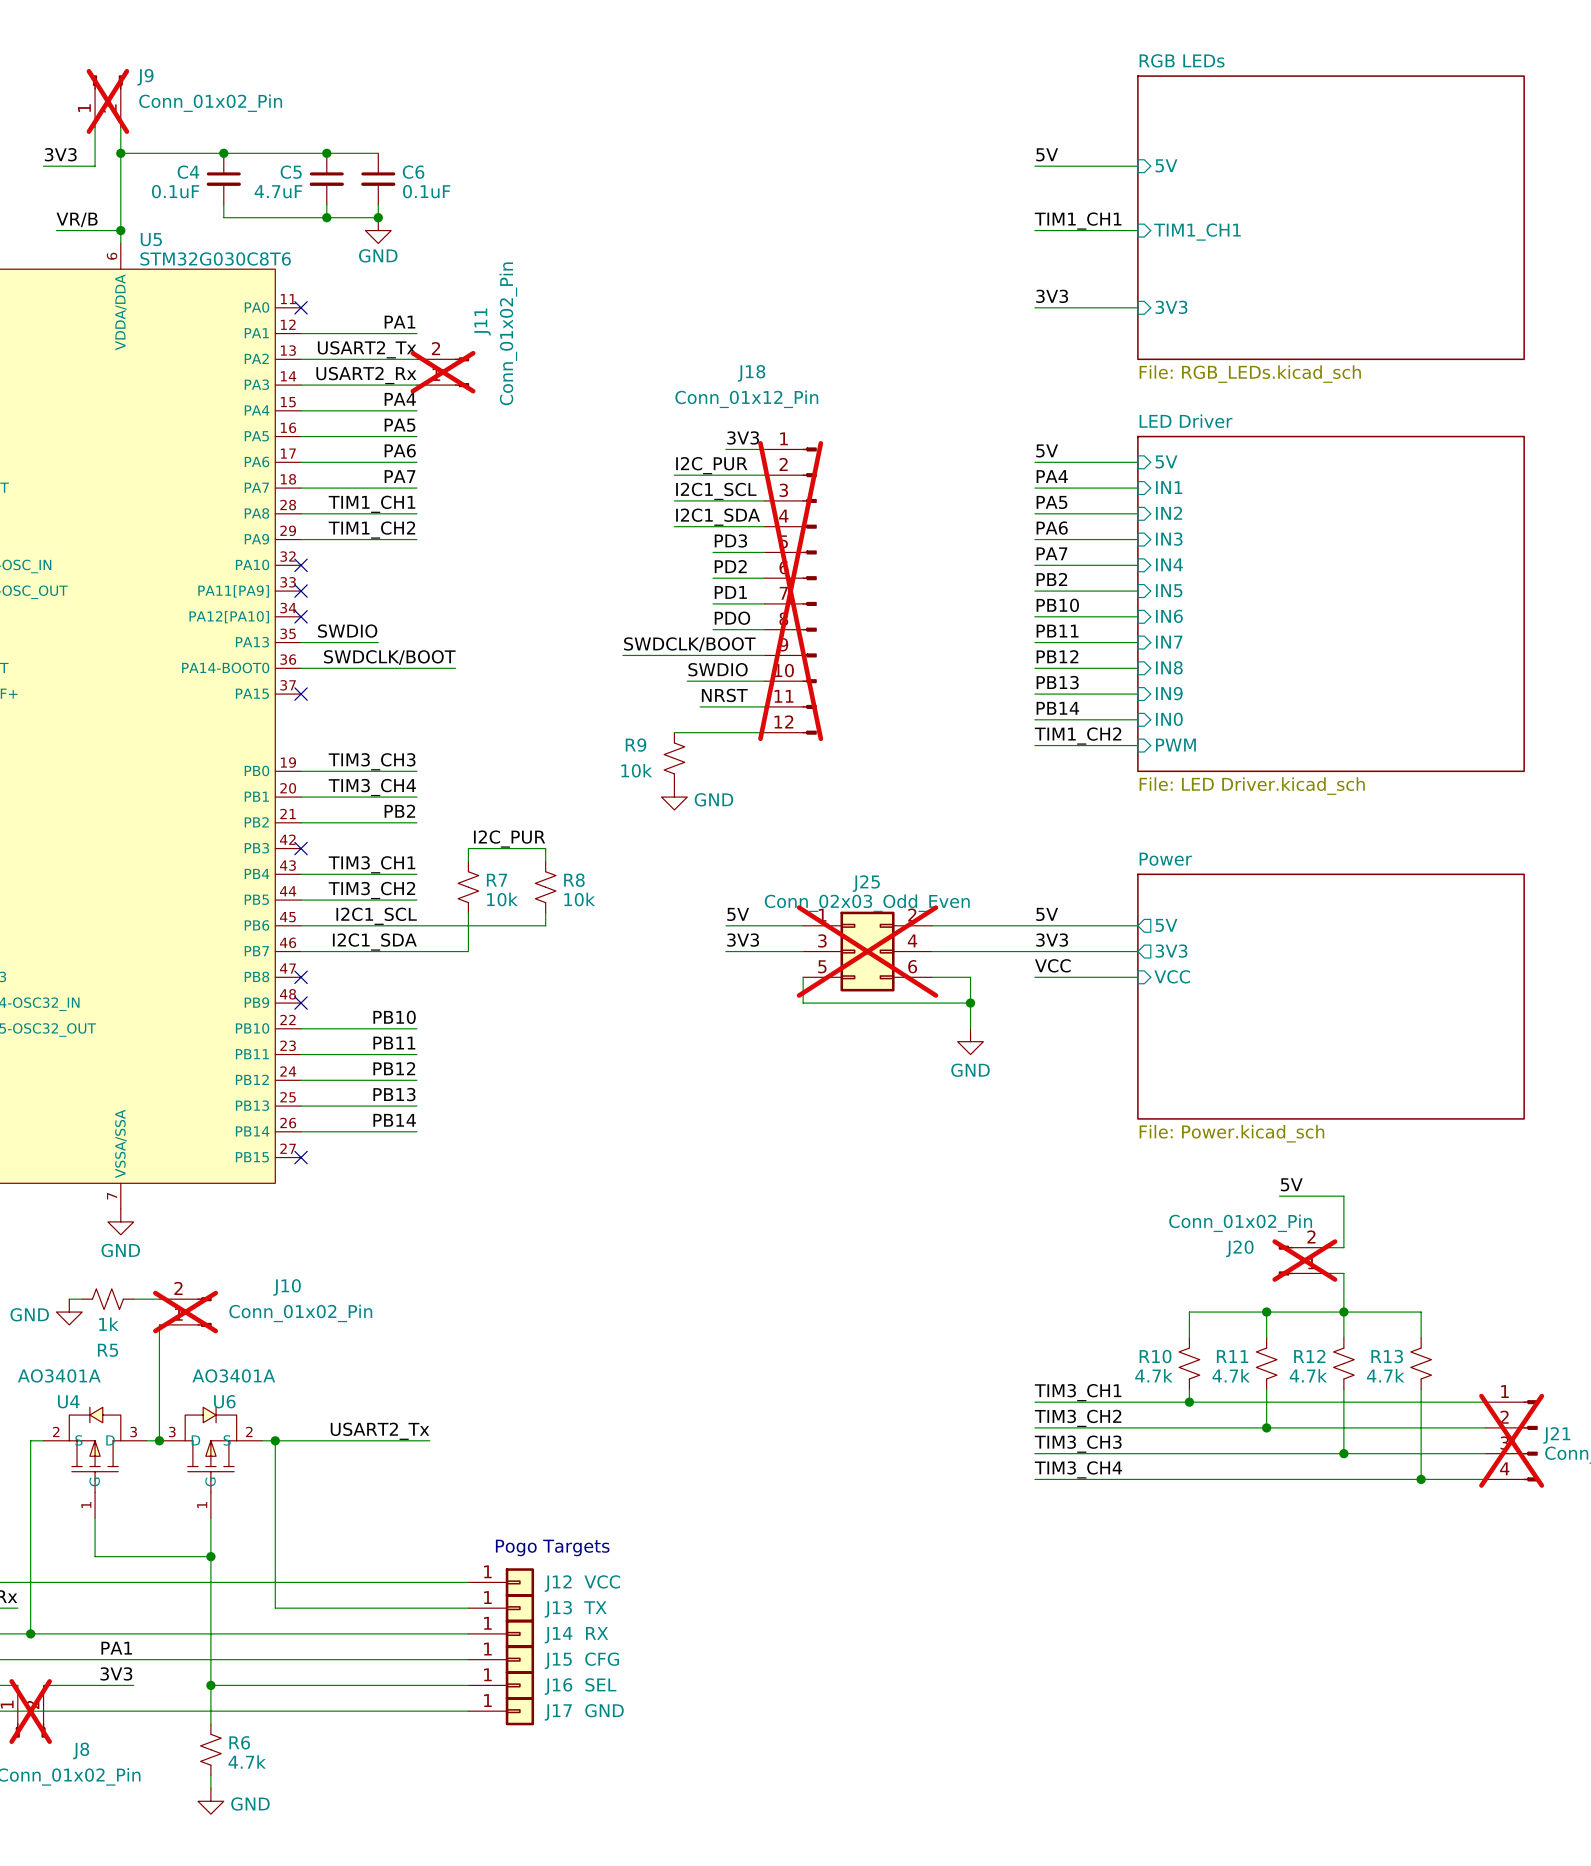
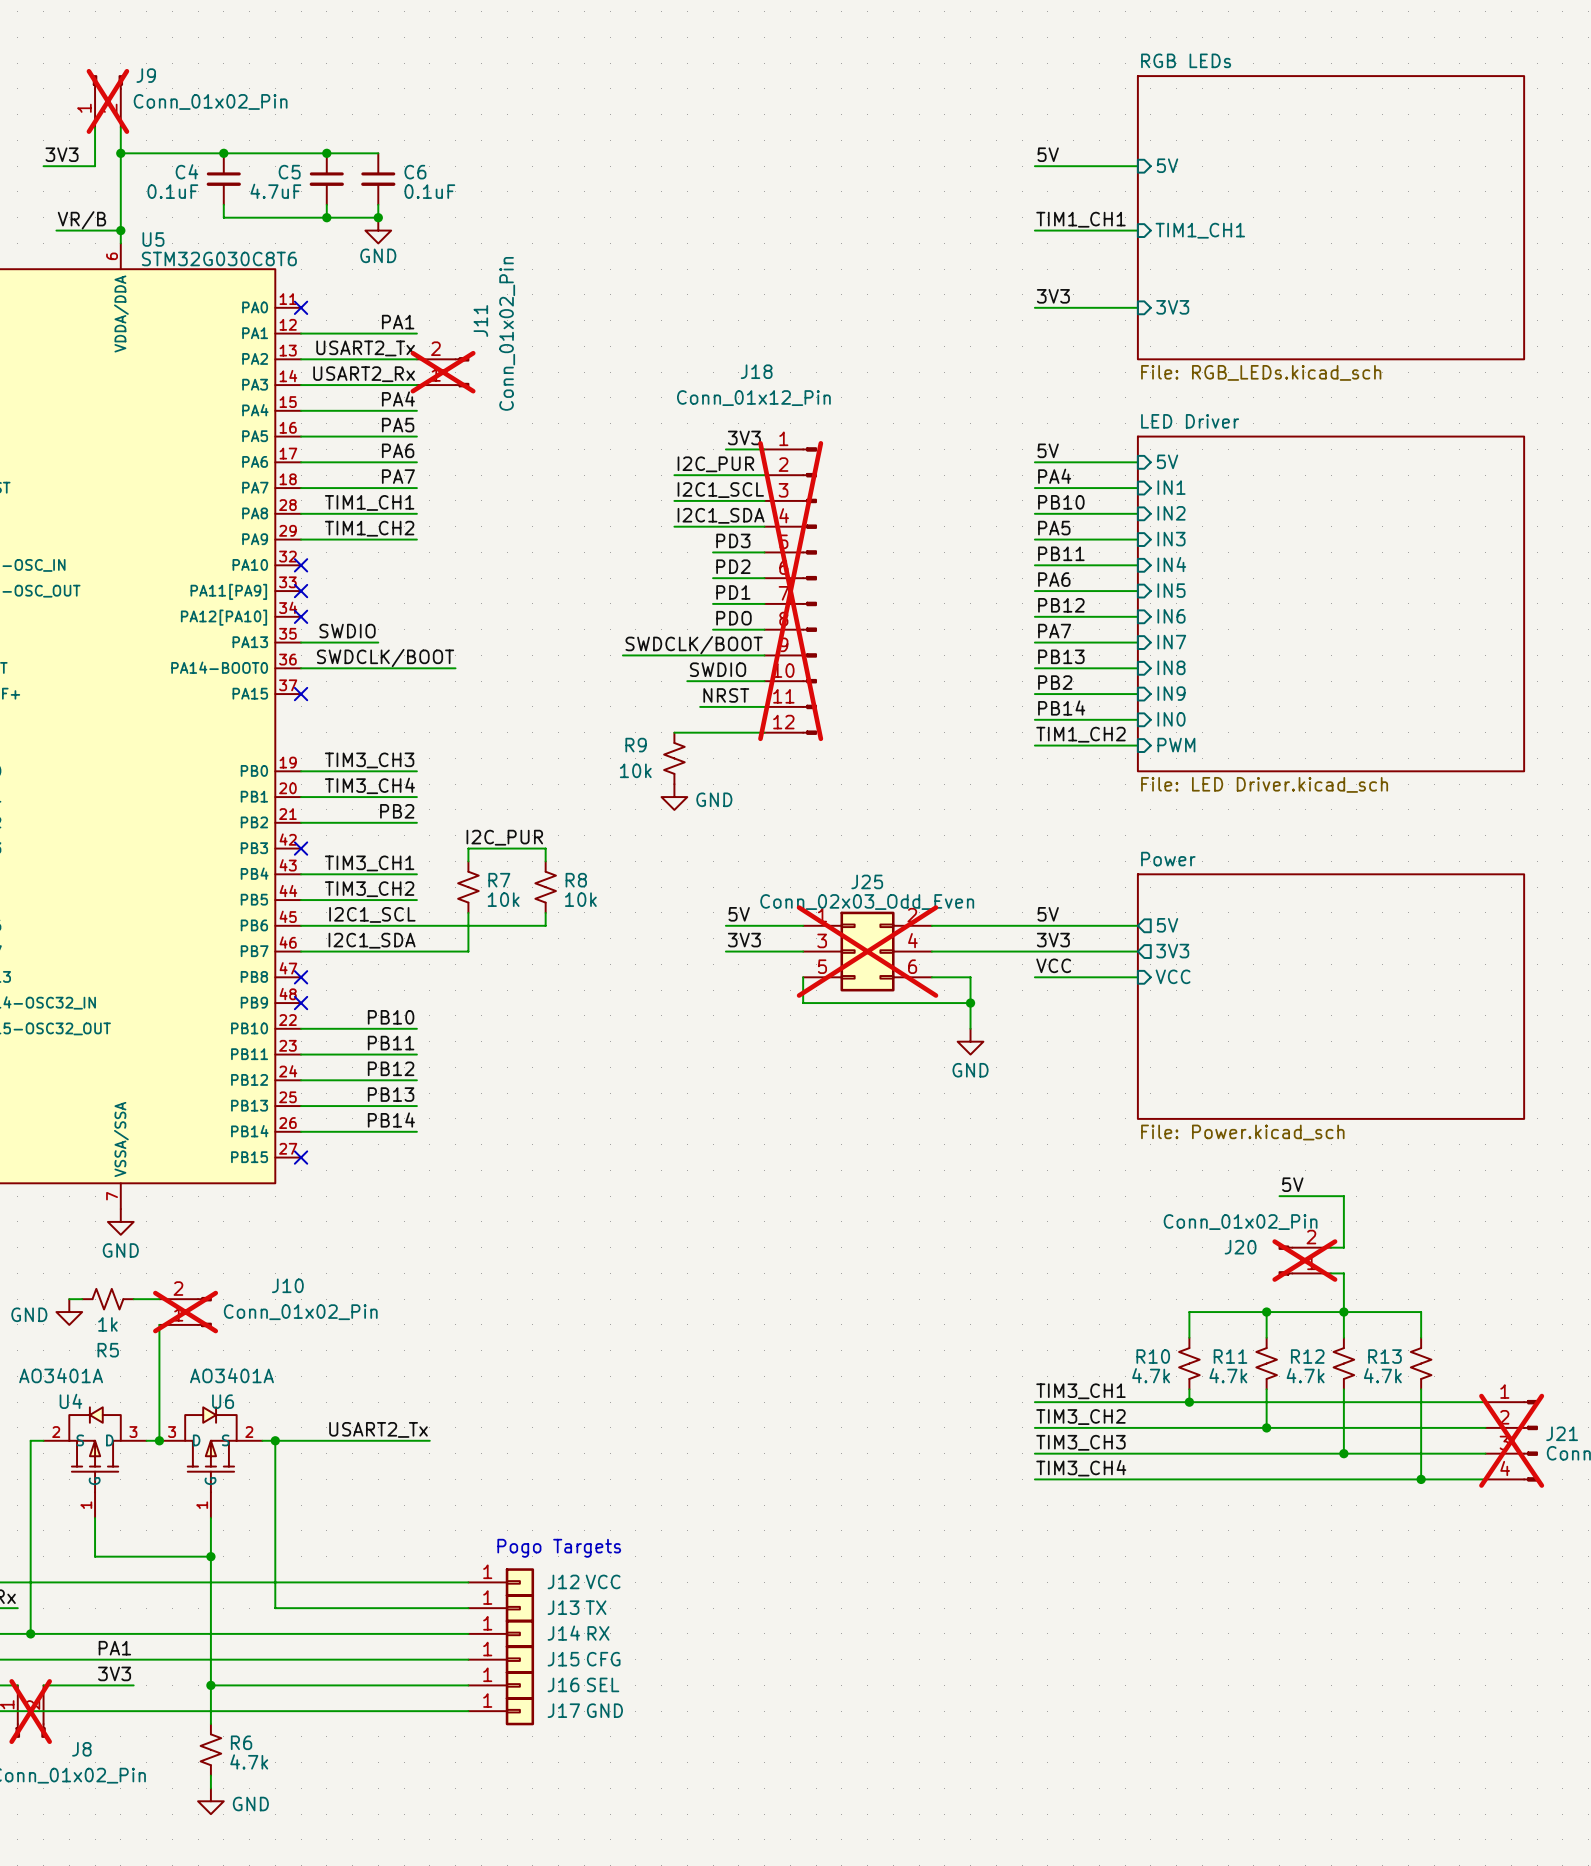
label: PA5 (1051, 502) -> PB10 (1061, 502)
label: PA6 (1052, 528) -> PA5 (1054, 528)
label: PA7 (1051, 553) -> PB11 (1061, 553)
label: PB2 (1051, 579) -> PA6 (1054, 579)
label: PB10 (1057, 605) -> PB12 (1061, 605)
label: PB11 (1057, 631) -> PA7 (1054, 631)
label: PB12 (1057, 656) -> PB13 (1061, 656)
label: PB13 (1057, 682) -> PB2 (1055, 682)

